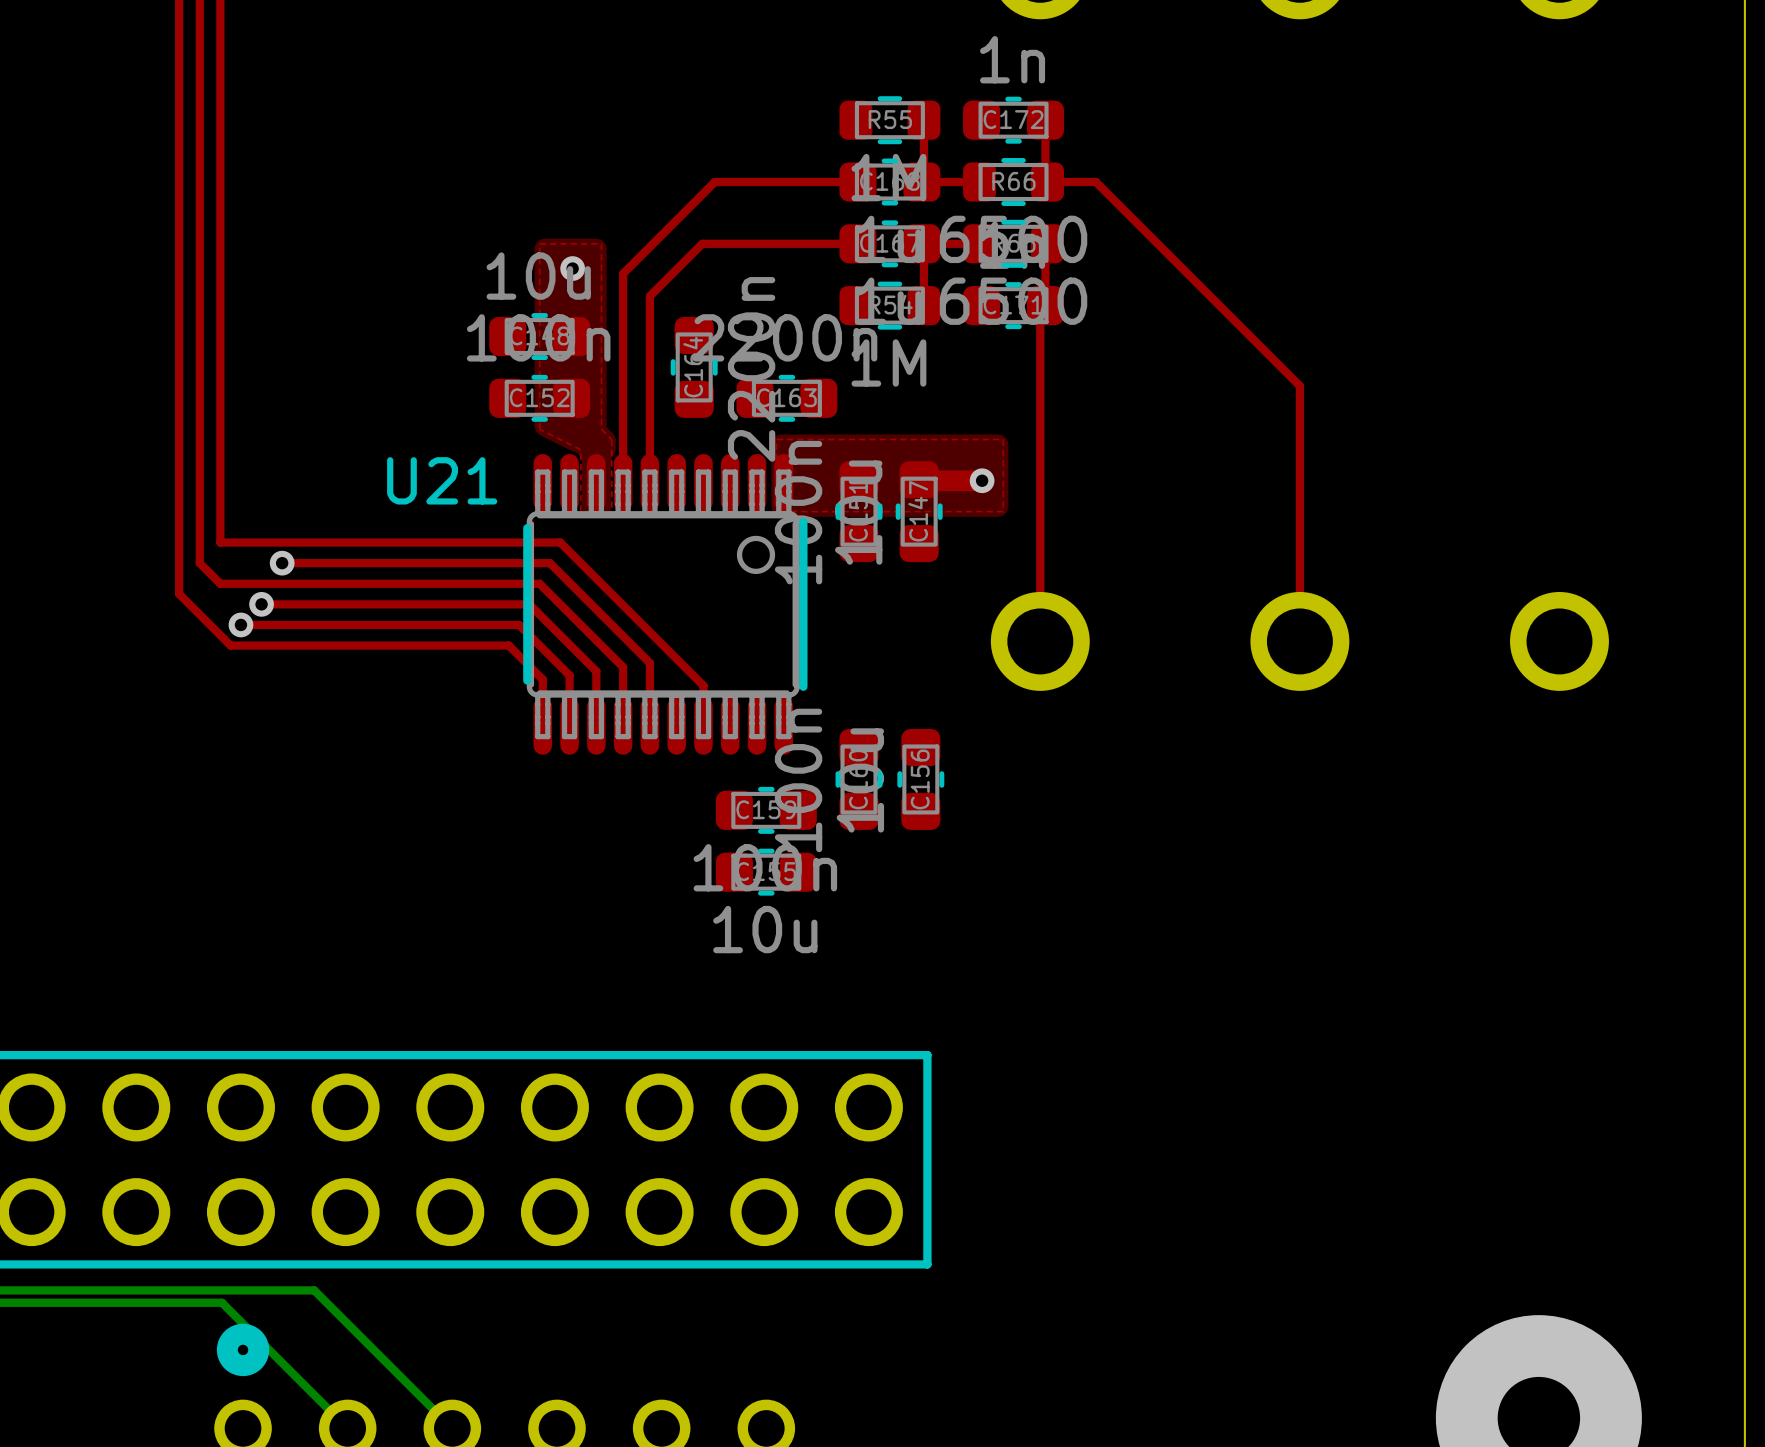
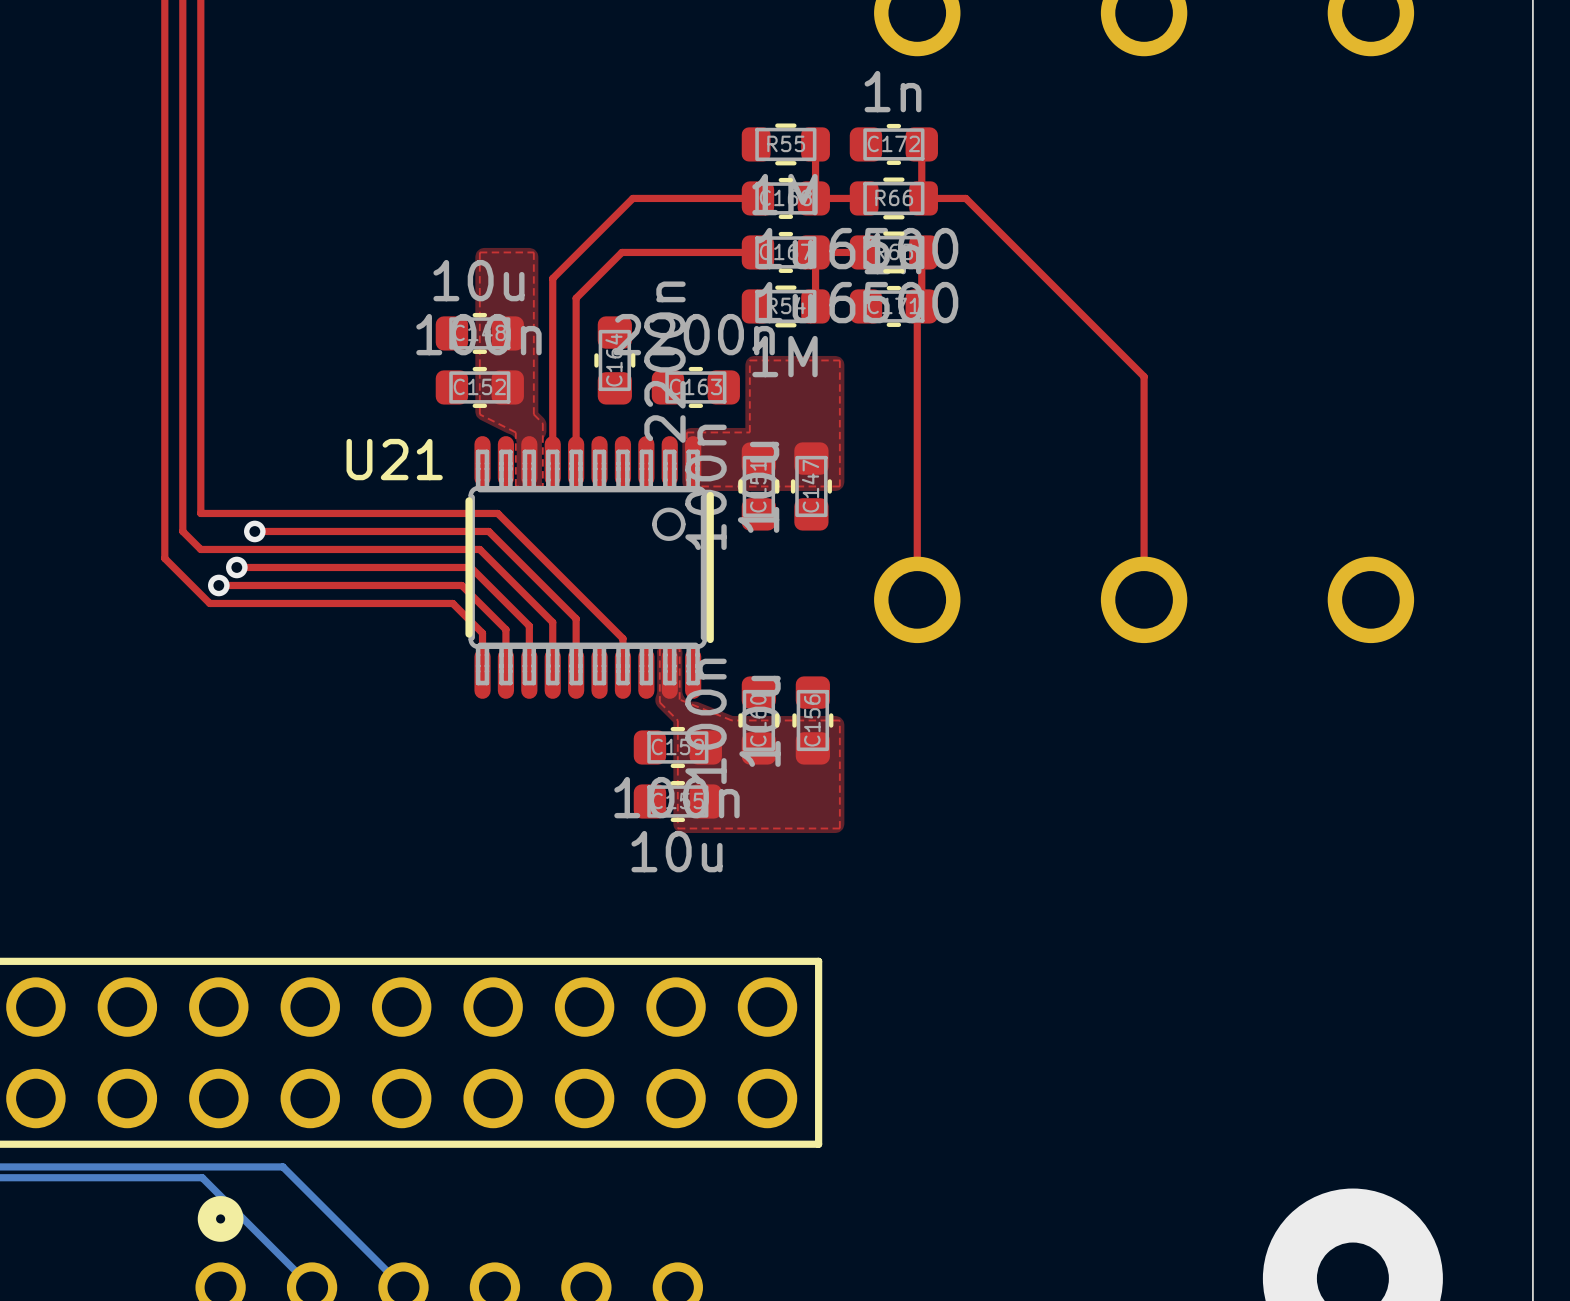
via: (572, 268) -> none
top zone outline: (776, 449) (776, 439) (1003, 439) (1003, 511) (951, 511) -> (686, 432) (749, 432) (749, 360) (839, 360) (839, 486)
top track: (921, 480) (982, 480) -> none
via: (982, 480) -> none
top zone outline: none -> (659, 648) (659, 702) (677, 720) (677, 828) (839, 828) (839, 720) (731, 720) (679, 699) (679, 648) (659, 648)

